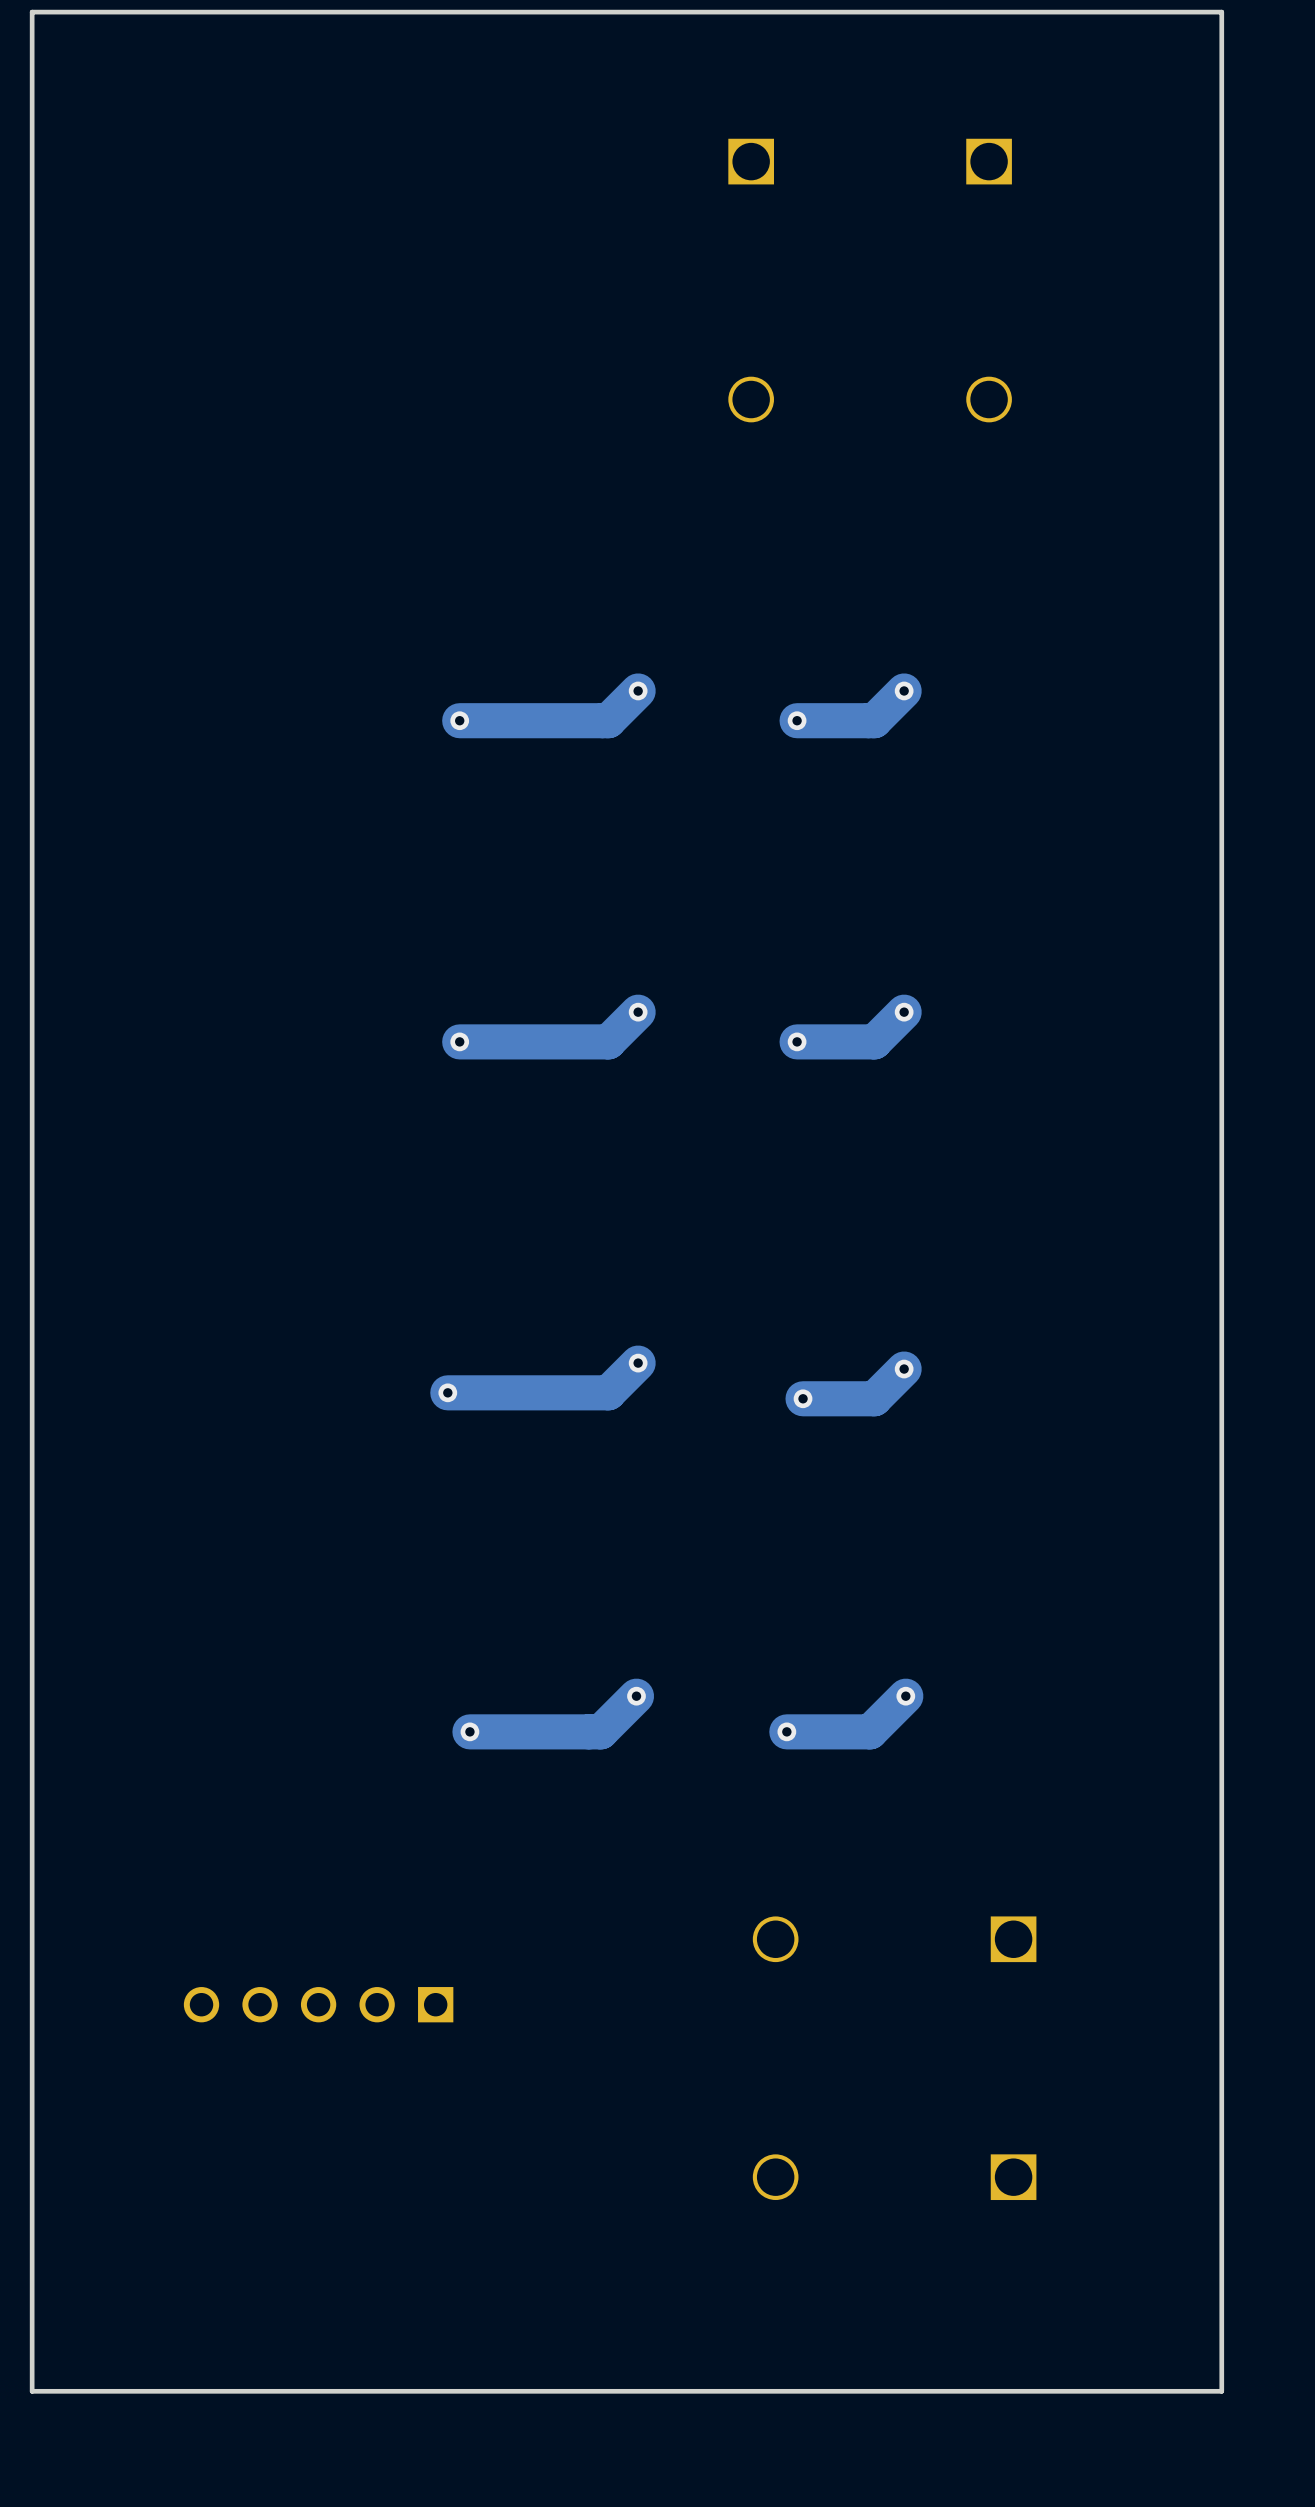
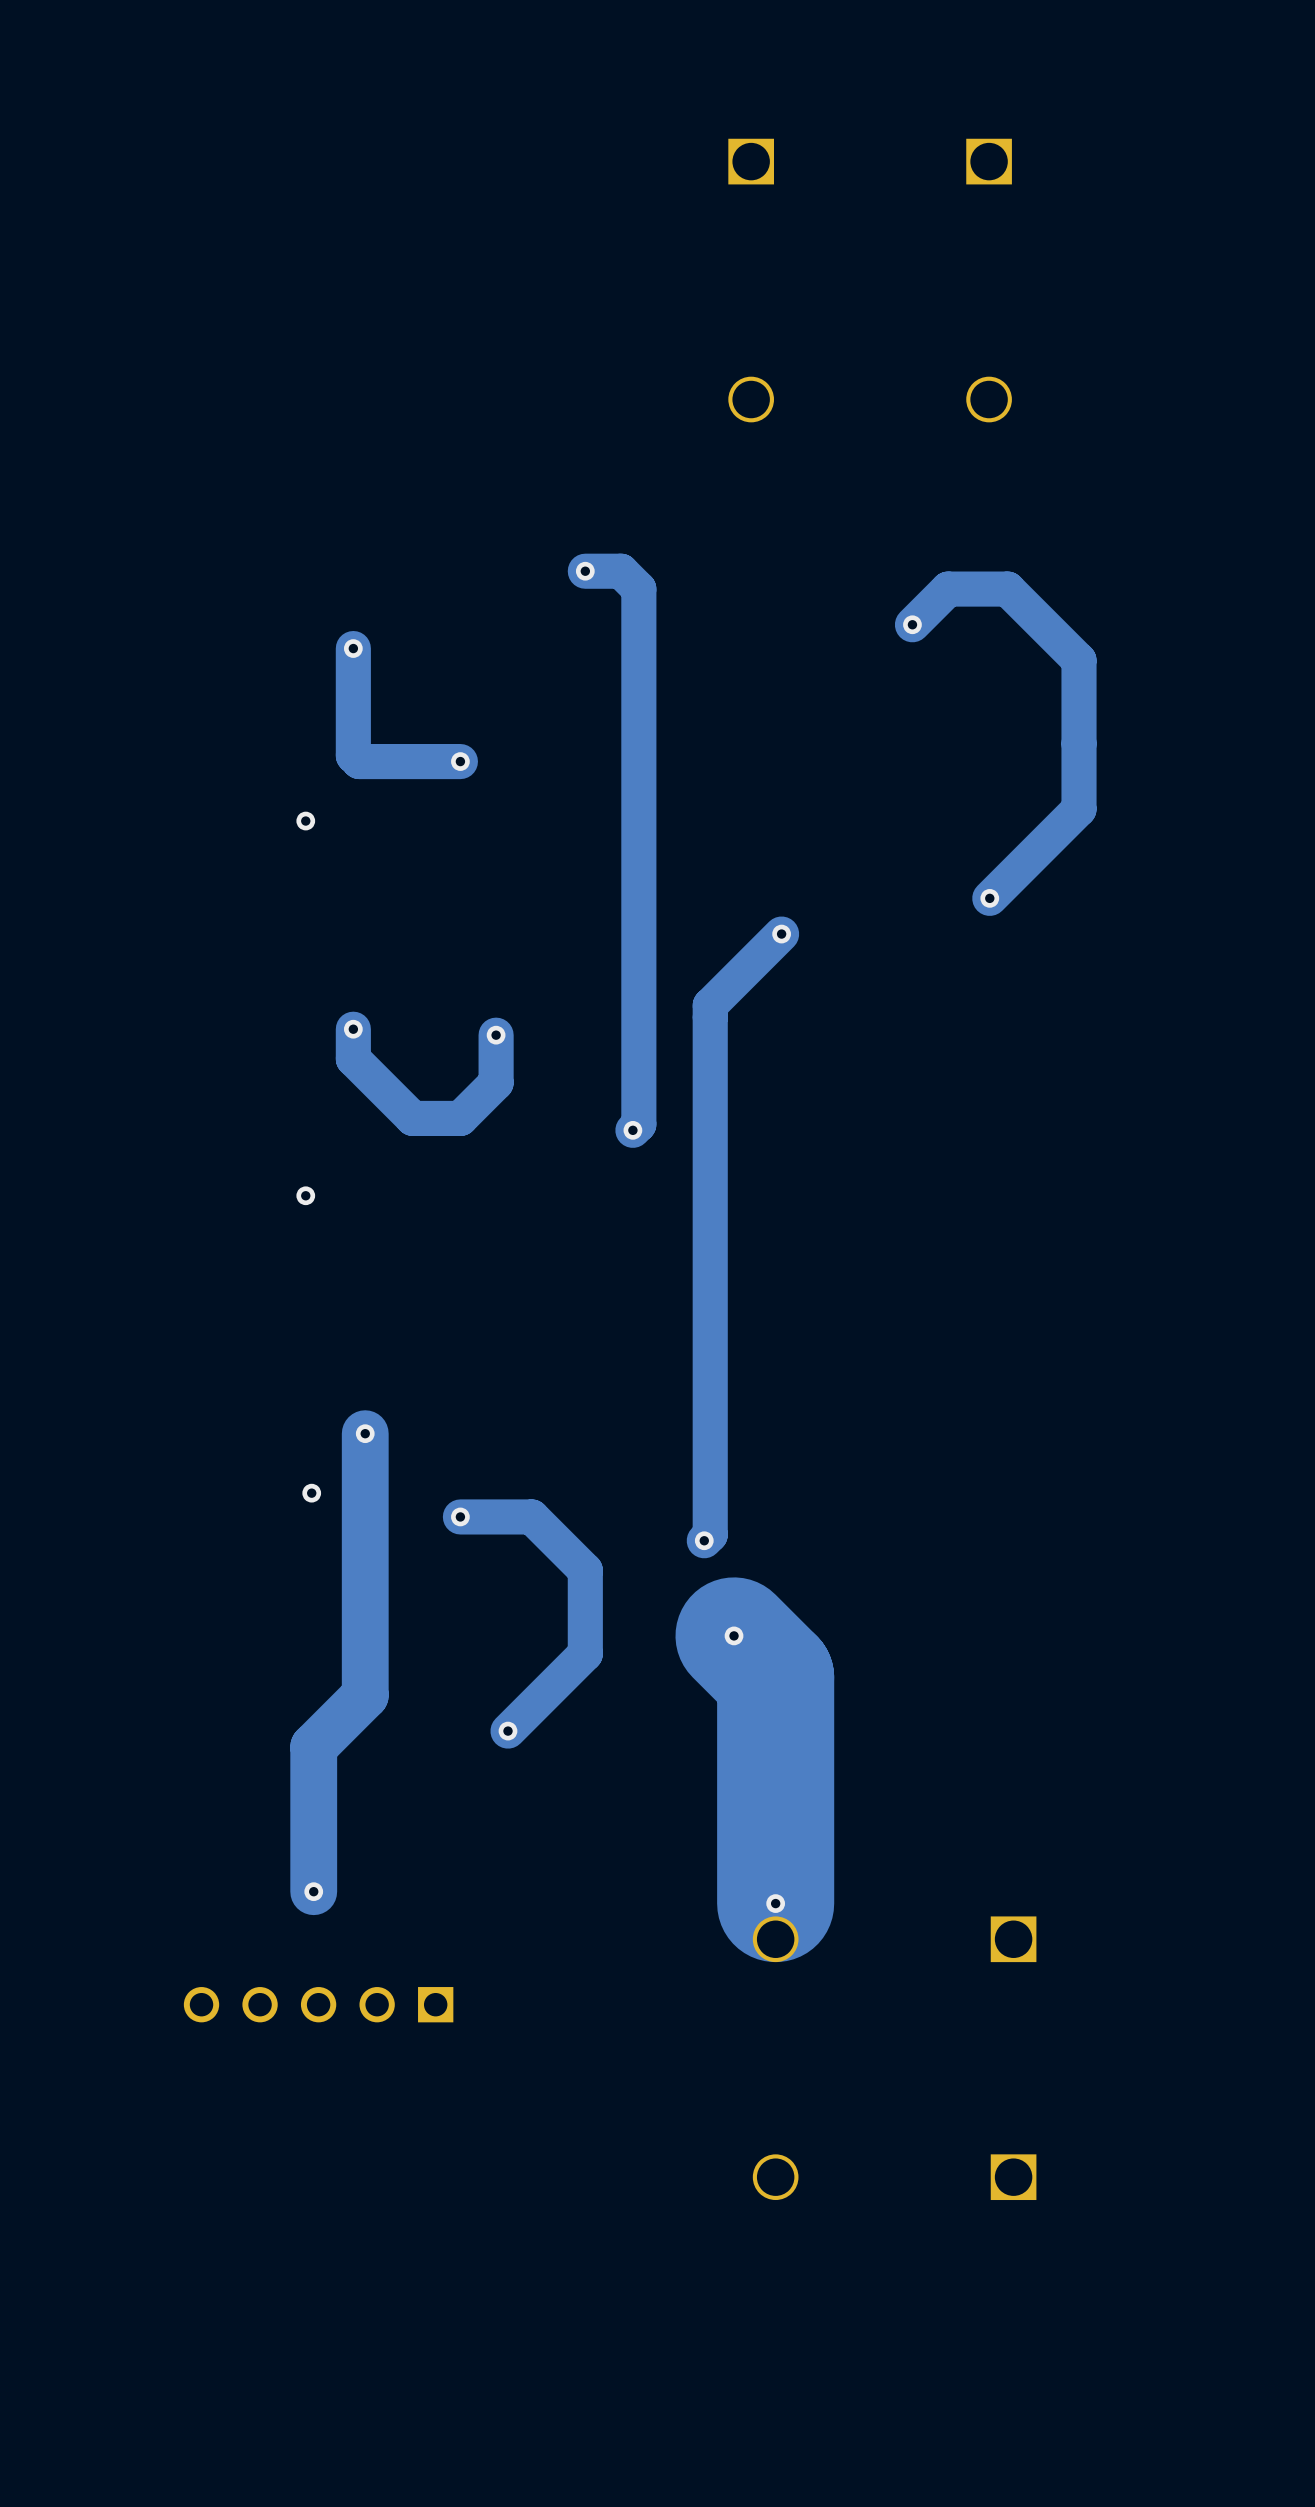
board edge: (1221, 12) (32, 12) (32, 2391) (1221, 2391) (1221, 12) -> none
track: none -> (585, 571) (621, 571) (638, 589) (638, 1124) (632, 1130)
via: none -> (585, 571)
track: none -> (912, 624) (948, 589) (1007, 589) (1079, 660) (1079, 809) (989, 898)
track: none -> (353, 648) (353, 755) (359, 761) (460, 761)
via: none -> (353, 648)
track: (638, 690) (608, 720) (459, 720) -> none
via: (638, 690) -> none
track: (904, 690) (874, 720) (797, 720) -> none
via position: (904, 690) -> (912, 624)
via position: (459, 720) -> (460, 761)
via: (797, 720) -> none
via: none -> (305, 821)
via: none -> (989, 898)
track: none -> (781, 934) (710, 1005) (710, 1534) (704, 1540)
via: none -> (781, 934)
track: (638, 1012) (608, 1041) (459, 1041) -> none
via: (638, 1012) -> none
track: (904, 1012) (874, 1041) (797, 1041) -> none
via: (904, 1012) -> none
track: none -> (353, 1029) (353, 1058) (412, 1118) (460, 1118) (496, 1082) (496, 1035)
via: none -> (353, 1029)
via position: (459, 1041) -> (496, 1035)
via: (797, 1041) -> none
via: none -> (632, 1130)
via: none -> (305, 1195)
track: (638, 1363) (608, 1392) (447, 1392) -> none
via: (638, 1363) -> none
track: (904, 1369) (874, 1398) (803, 1398) -> none
via: (904, 1369) -> none
via: (447, 1392) -> none
via: (803, 1398) -> none
track: none -> (365, 1433) (365, 1695) (313, 1746) (313, 1891)
via: none -> (365, 1433)
via: none -> (311, 1493)
track: none -> (460, 1516) (531, 1516) (585, 1570) (585, 1653) (508, 1731)
via: none -> (460, 1516)
via: none -> (704, 1540)
track: none -> (734, 1635) (775, 1677) (775, 1903)
via: none -> (734, 1635)
track: (636, 1696) (600, 1731) (469, 1731) -> none
via: (636, 1696) -> none
track: (905, 1696) (870, 1731) (786, 1731) -> none
via: (905, 1696) -> none
via position: (469, 1731) -> (508, 1731)
via: (786, 1731) -> none
via: none -> (313, 1891)
via: none -> (775, 1903)

